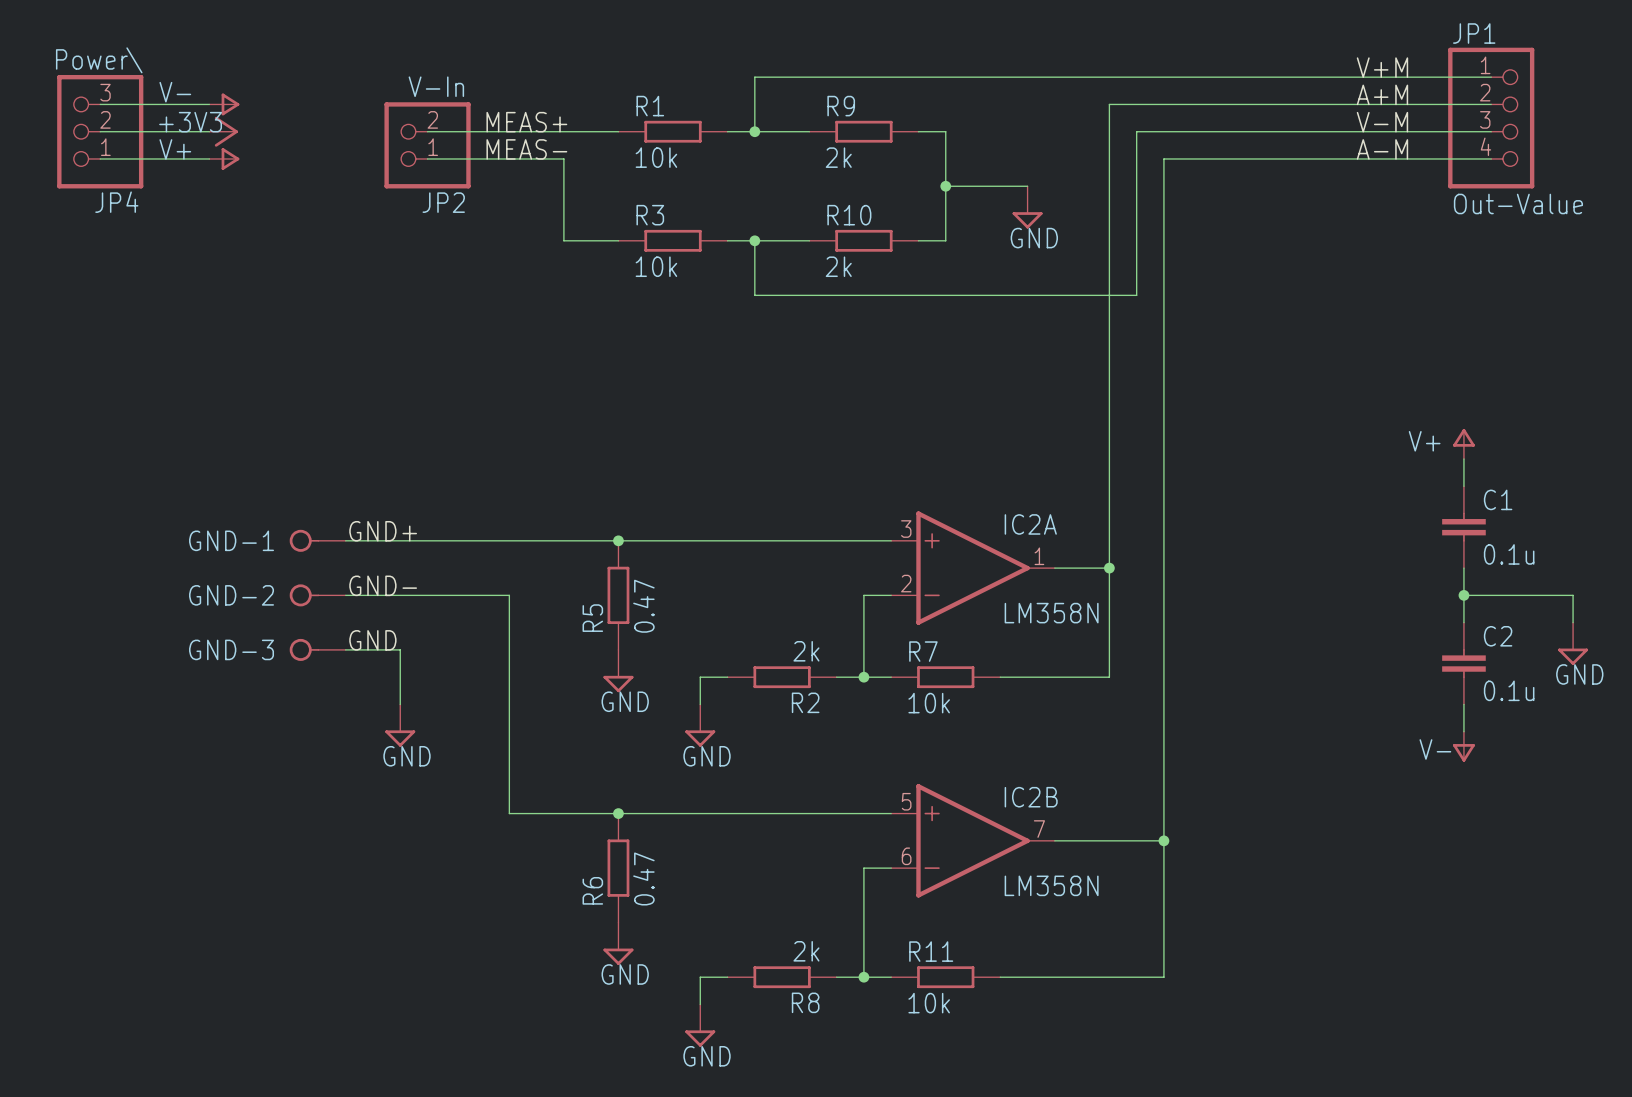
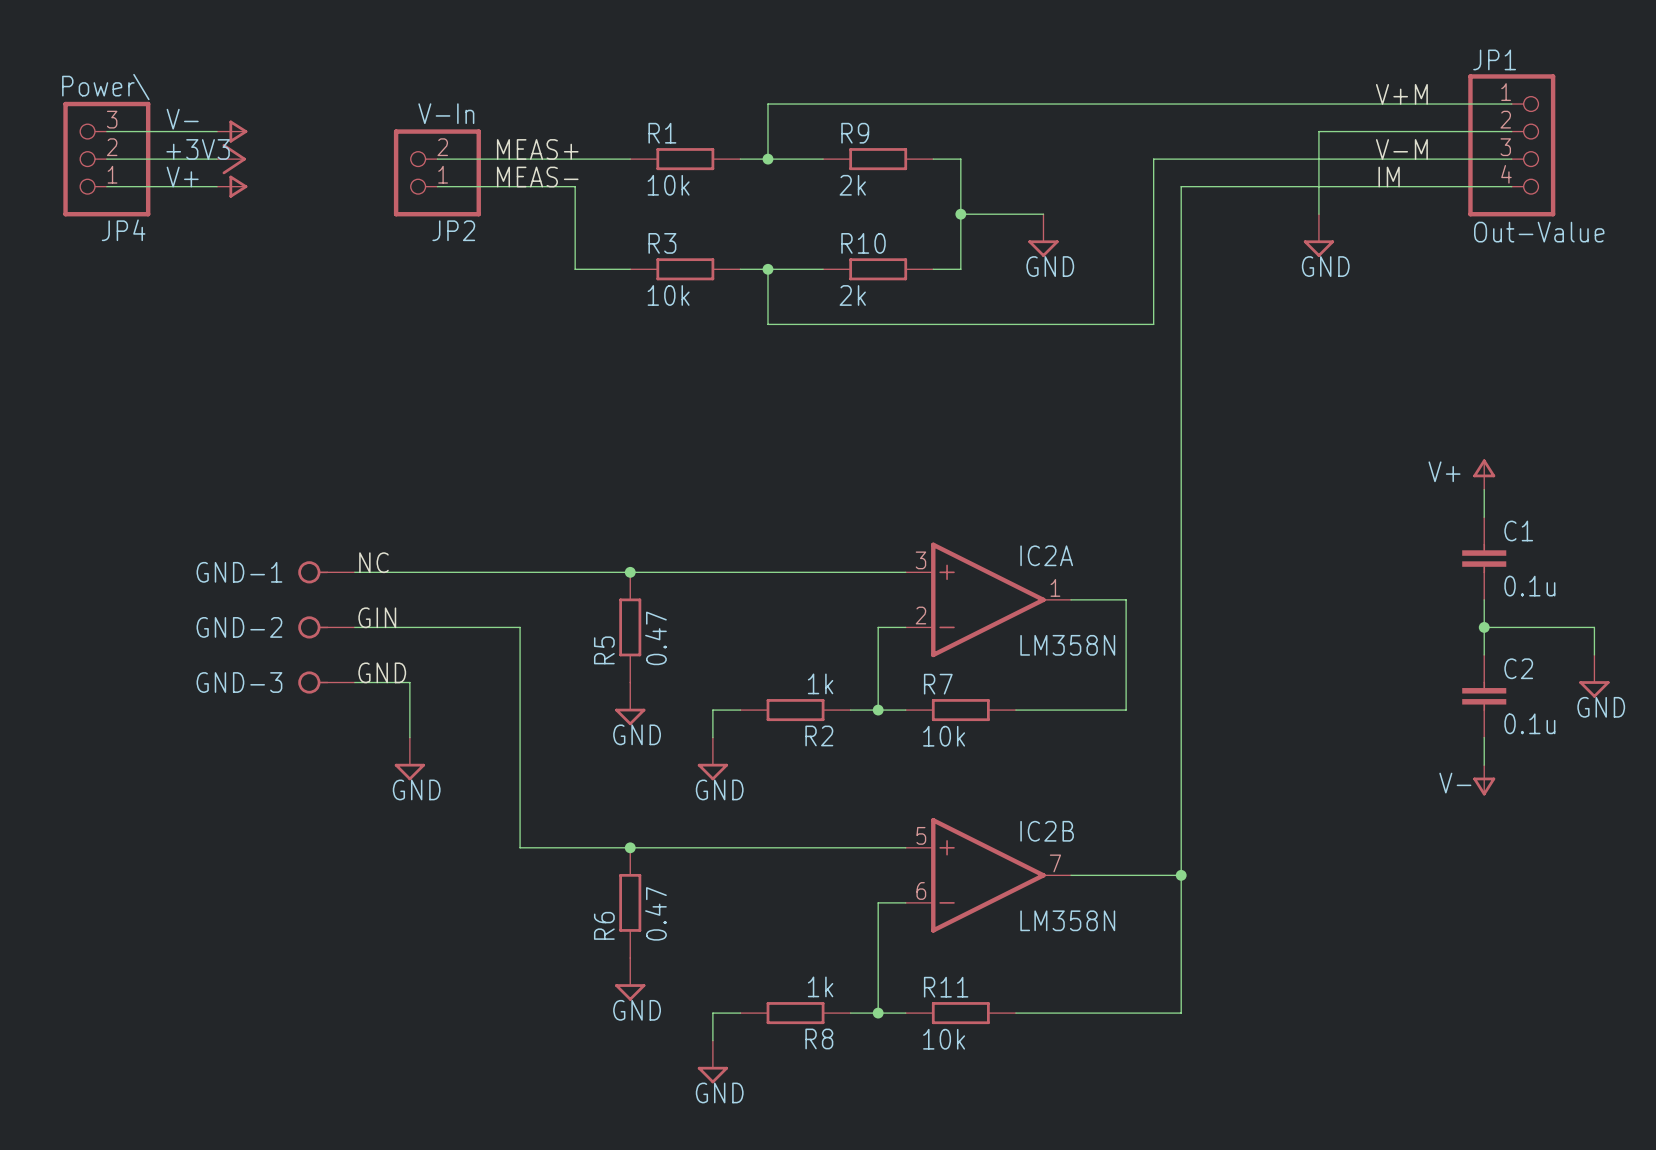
label: A+M (1382, 94) -> none
wire: (1300, 104) (1109, 104) (1109, 568) -> (1318, 131) (1318, 214)
label: A-M (1382, 149) -> IM (1389, 177)
power symbol: none -> GND (1318, 235)
label: GND+ (383, 531) -> NC (373, 562)
junction: (1109, 568) -> none
label: GND- (383, 585) -> GIN (377, 617)
R2 value: 2k (806, 651) -> 1k (820, 683)
R8 value: 2k (806, 951) -> 1k (820, 986)

